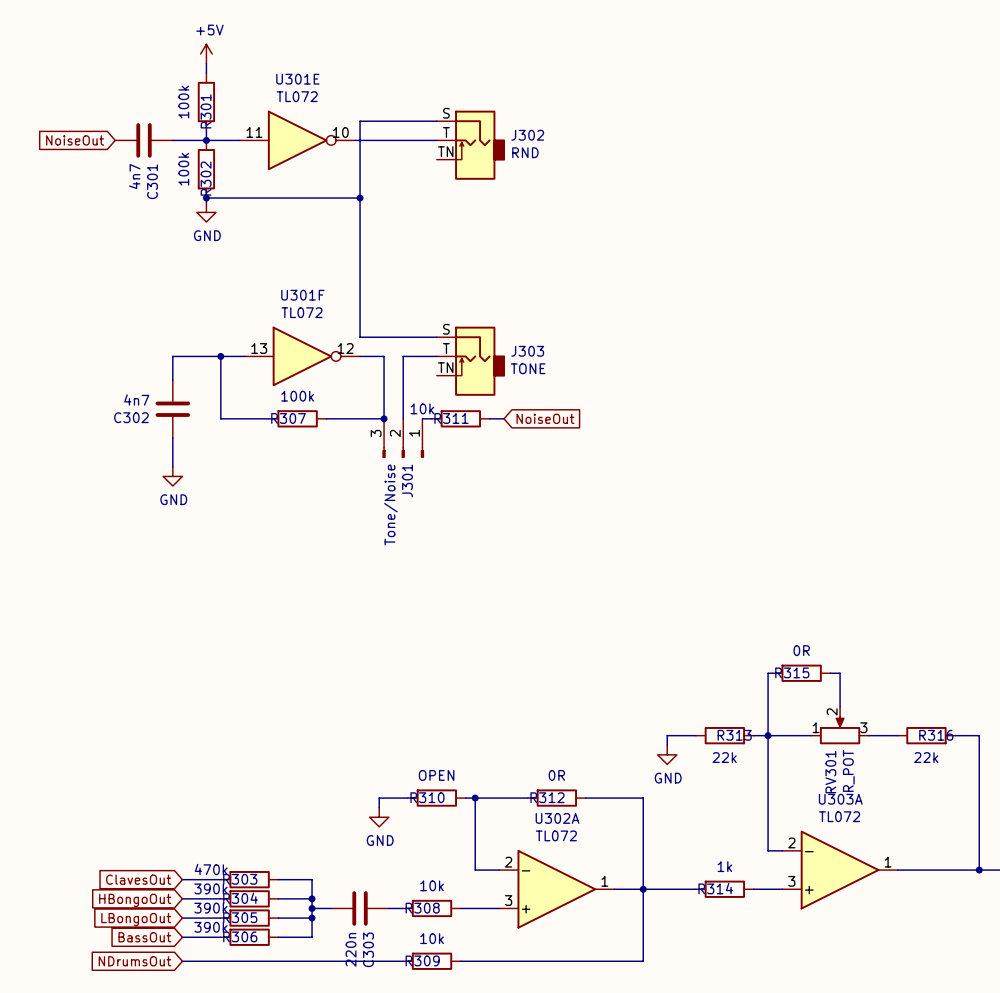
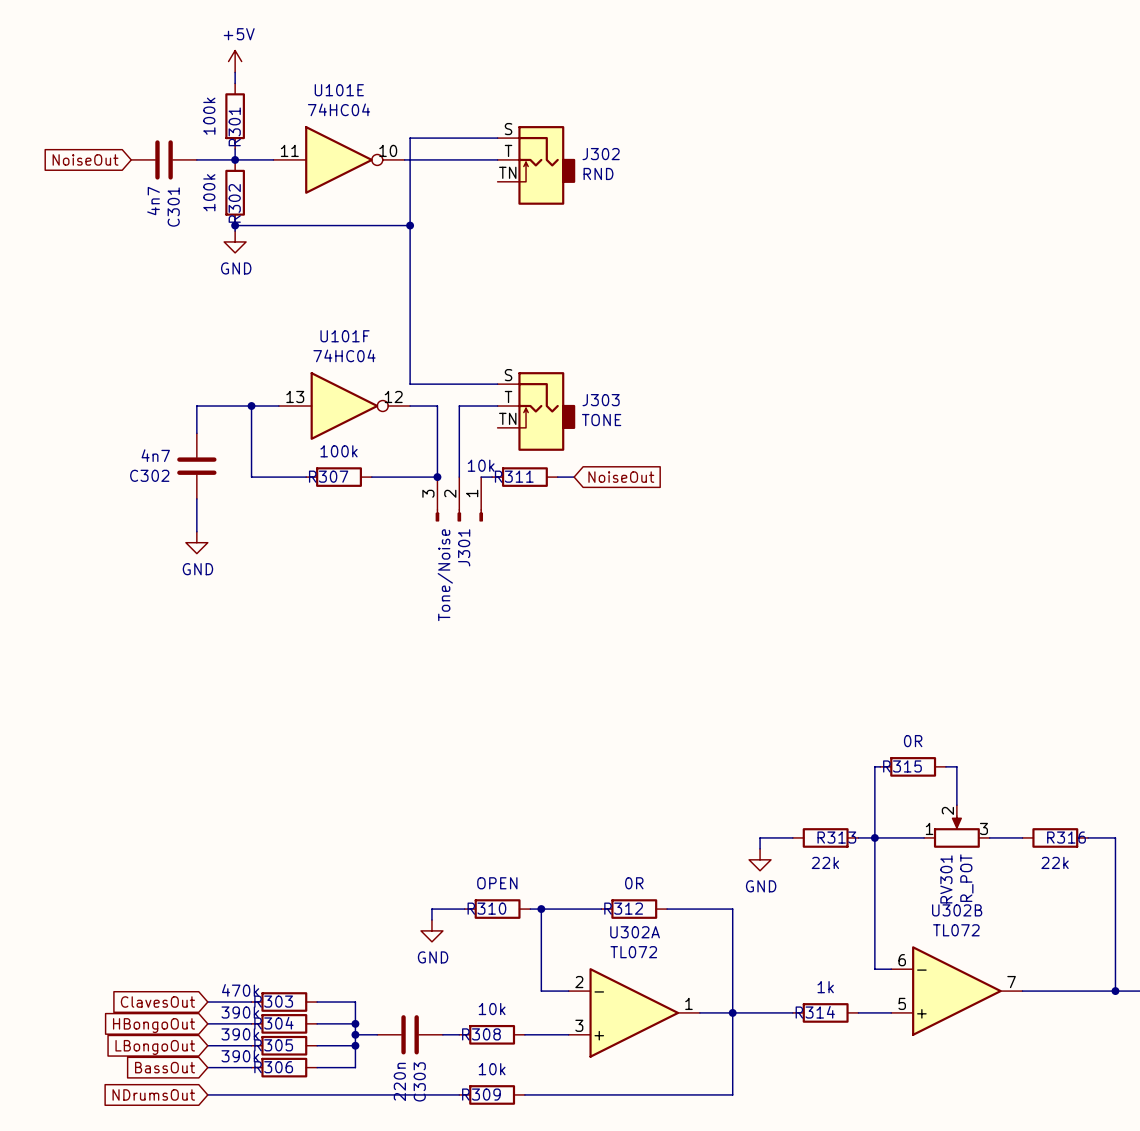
U301E name: U301E (297, 79) -> U101E (339, 90)
U301E value: TL072 (297, 96) -> 74HC04 (339, 109)
U301F name: U301F (302, 295) -> U101F (345, 336)
U301F value: TL072 (301, 312) -> 74HC04 (344, 355)
U303A name: U303A (840, 799) -> U302B (957, 910)
U303A pin number: 2 (791, 842) -> 6 (902, 960)
U303A pin number: 1 (888, 862) -> 7 (1011, 982)
U303A pin number: 3 (791, 881) -> 5 (902, 1003)

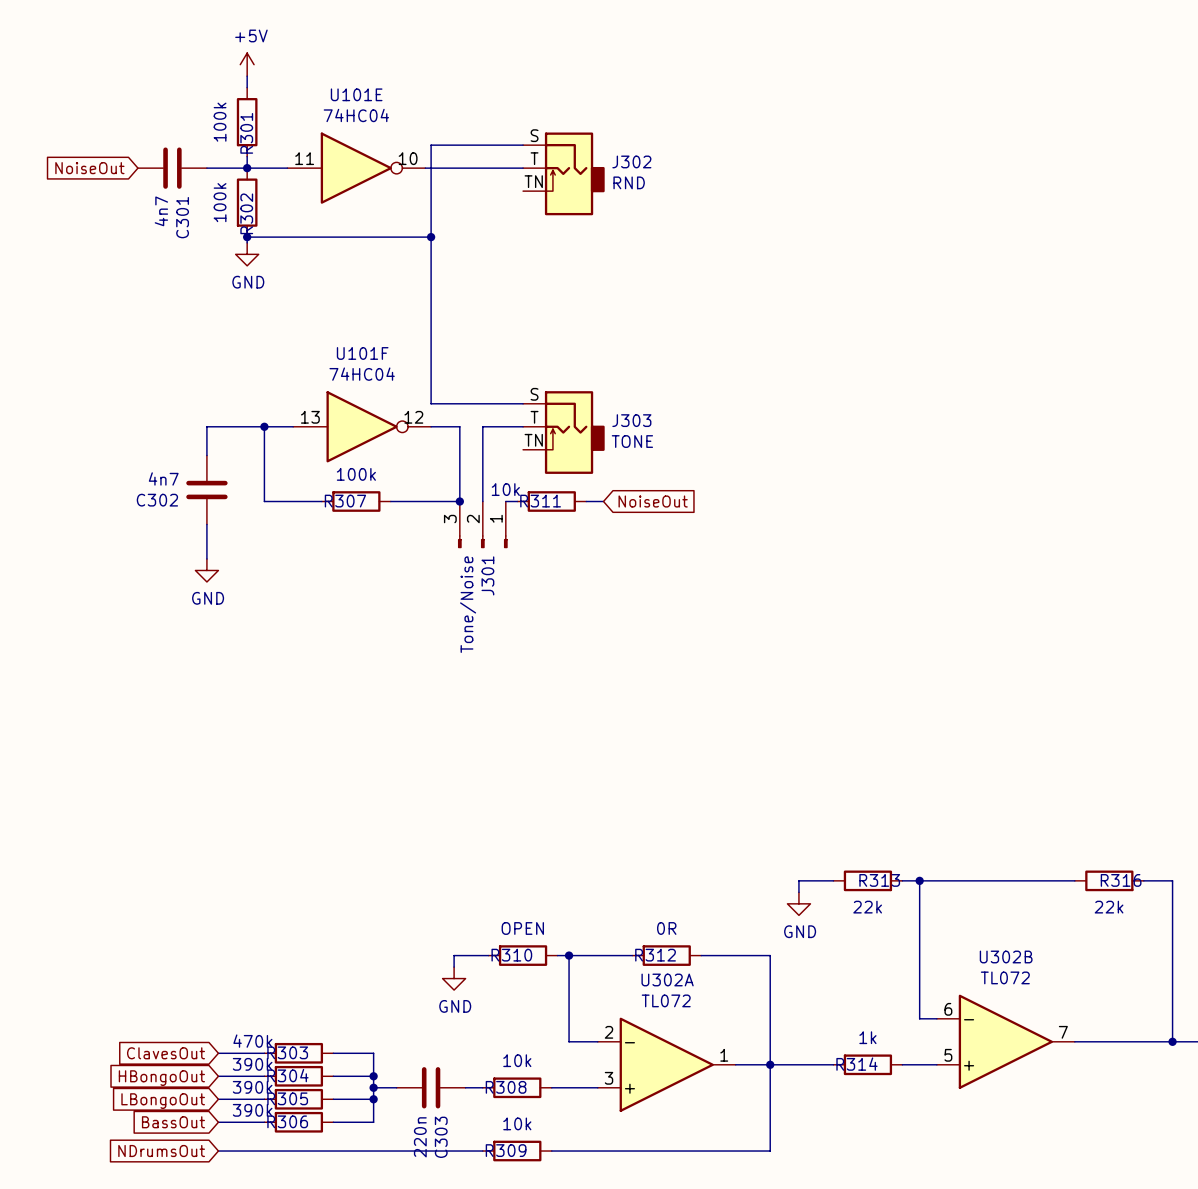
wire: (880, 766) (874, 766) (874, 837) -> none
R315: 0R (913, 766) -> none
wire: (945, 766) (956, 766) (956, 805) -> none
RV301: R_POT (956, 826) -> none
wire: none -> (971, 880) (1040, 880)

